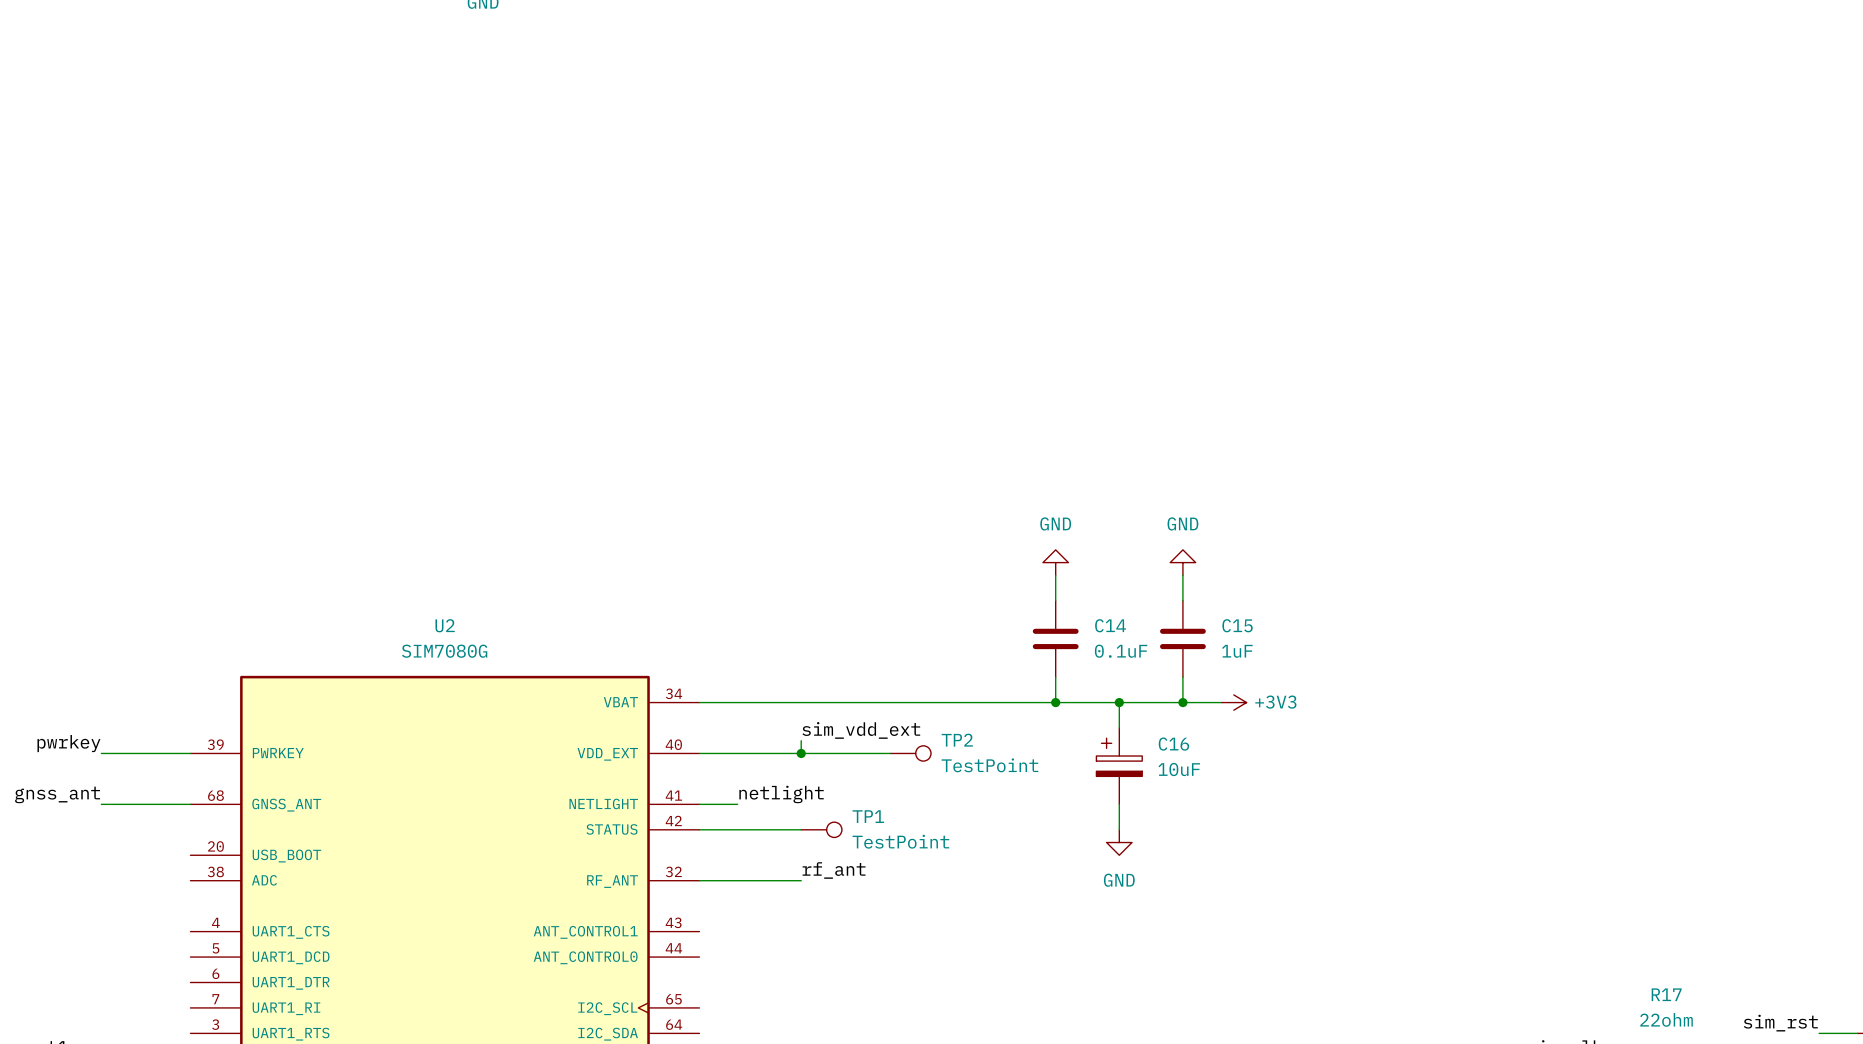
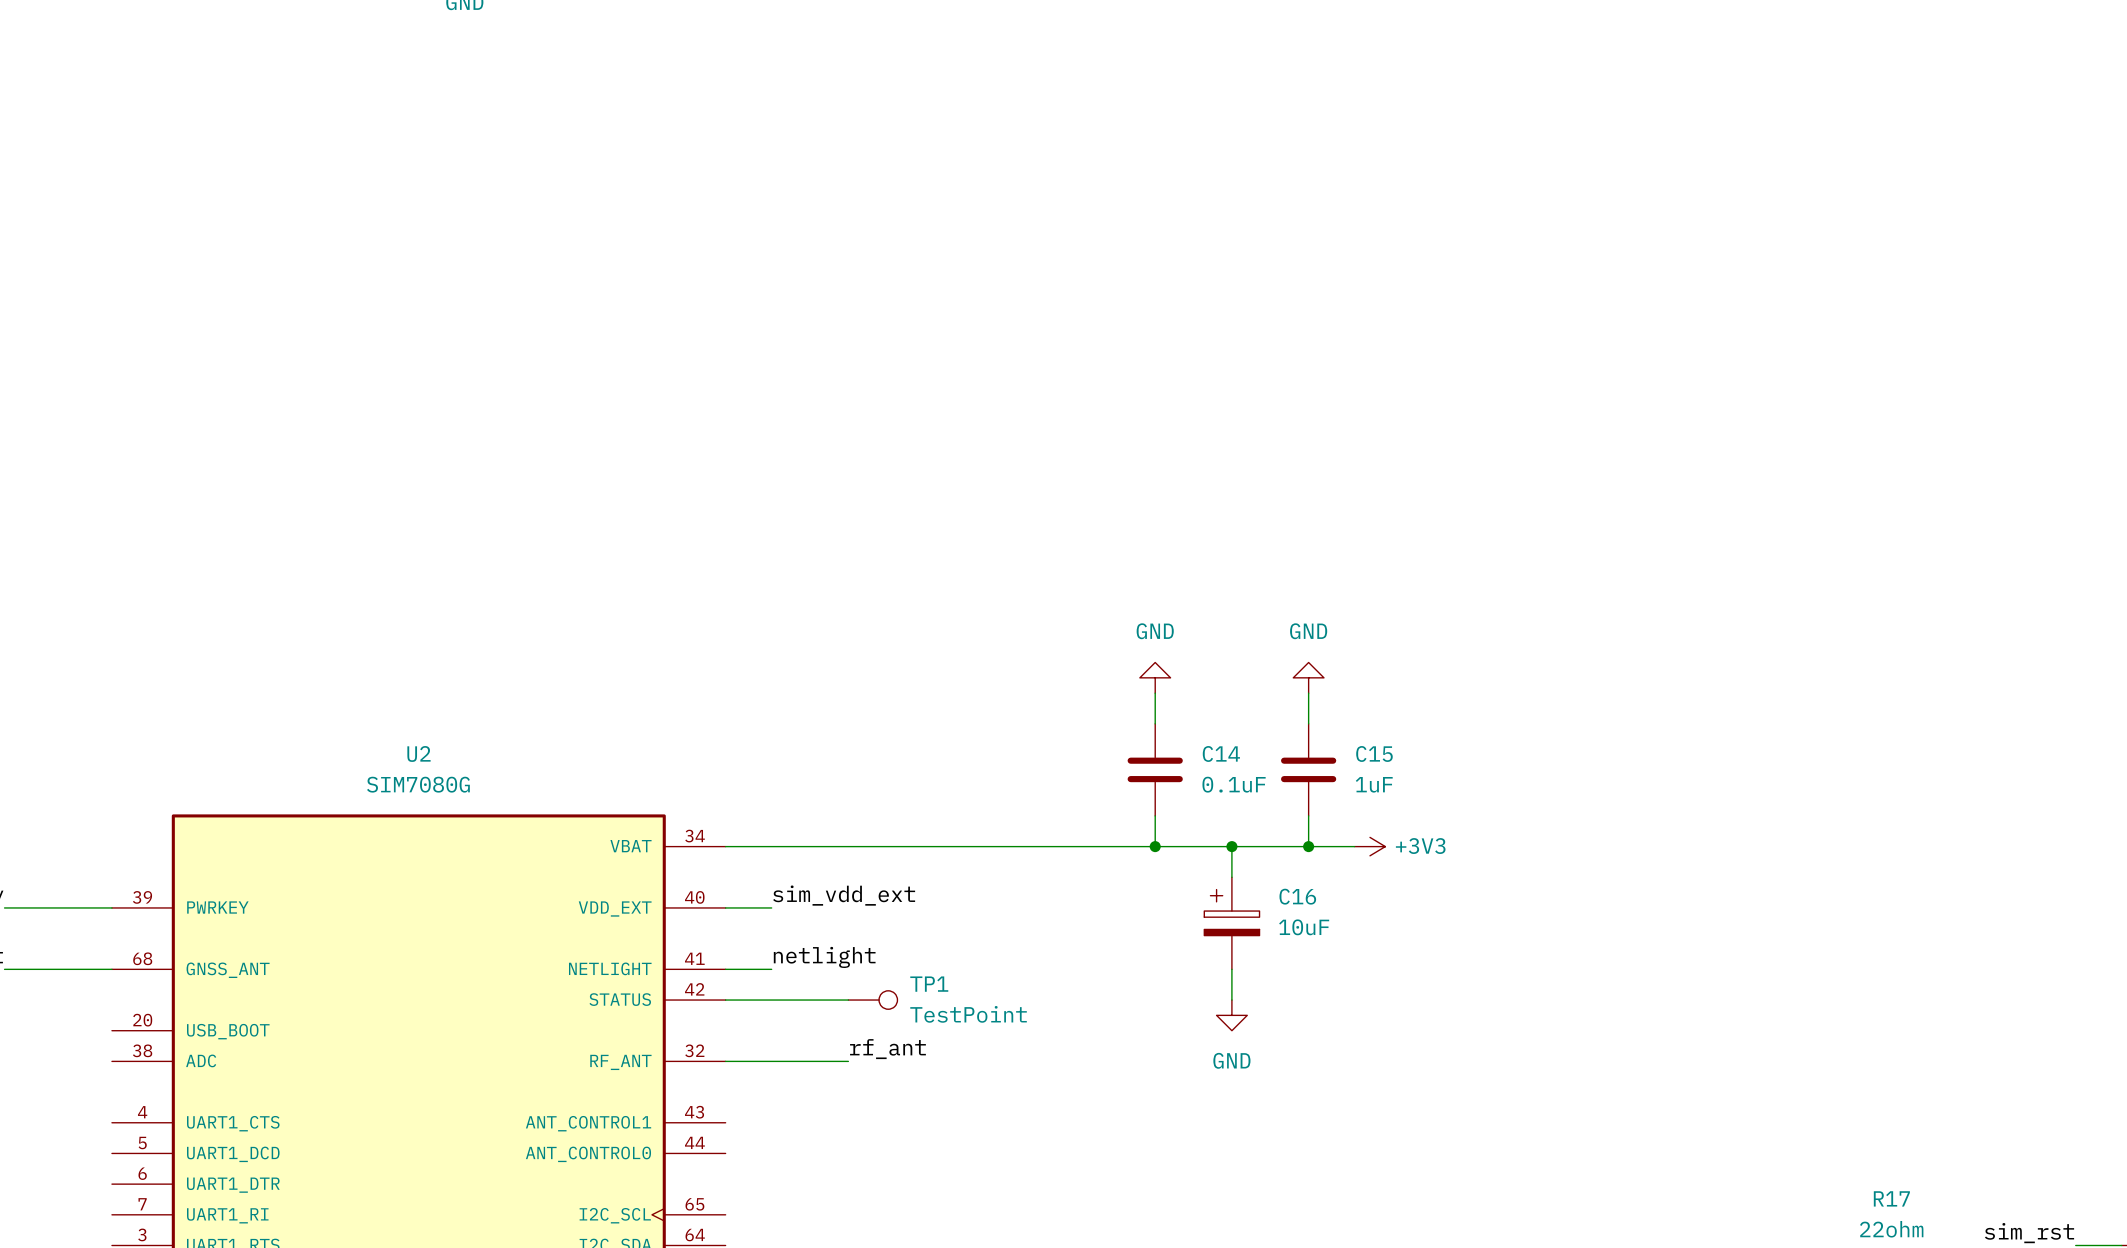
label position: sim_vdd_ext (861, 730) -> sim_vdd_ext (844, 895)
wire: (801, 740) (801, 753) -> none
wire: (737, 753) (890, 753) -> none
junction: (801, 753) -> none
TP2: TestPoint (910, 753) -> none

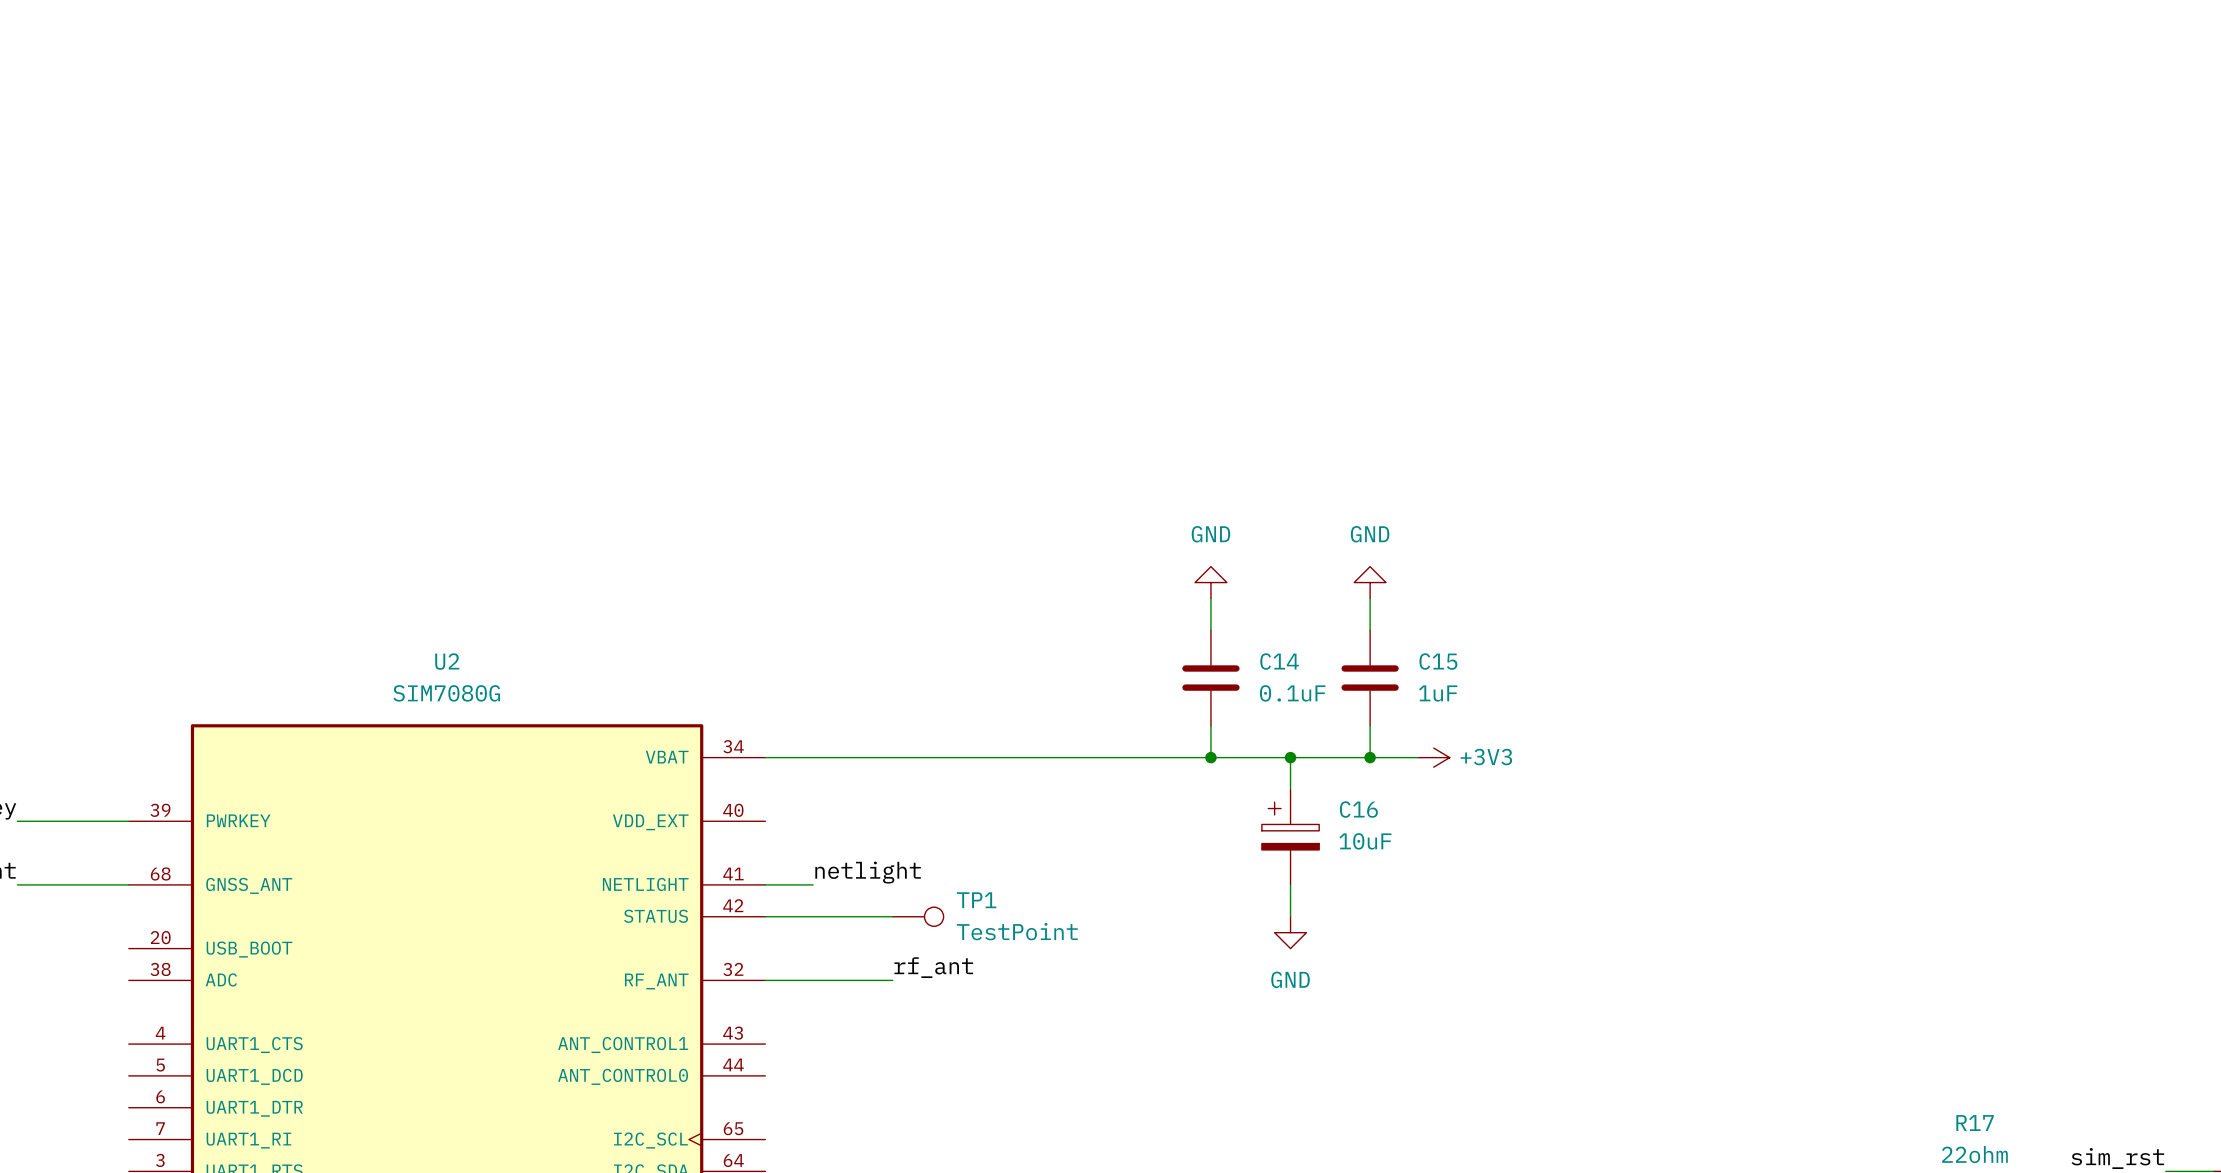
label: sim_vdd_ext (844, 895) -> none
wire: (725, 907) (771, 907) -> none

